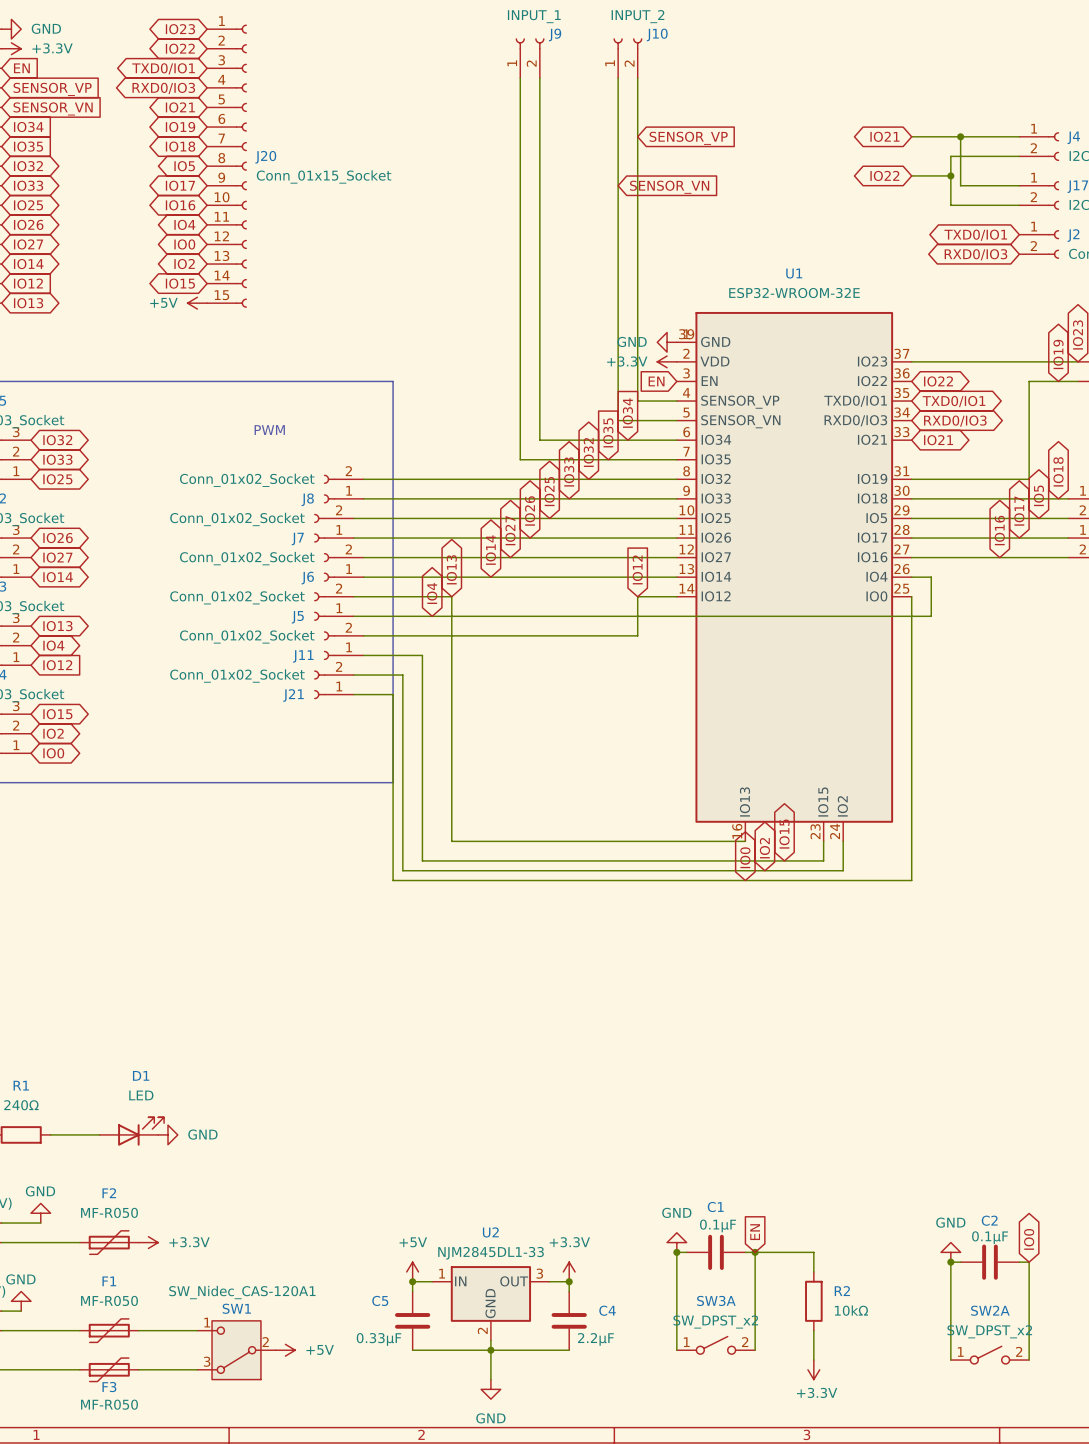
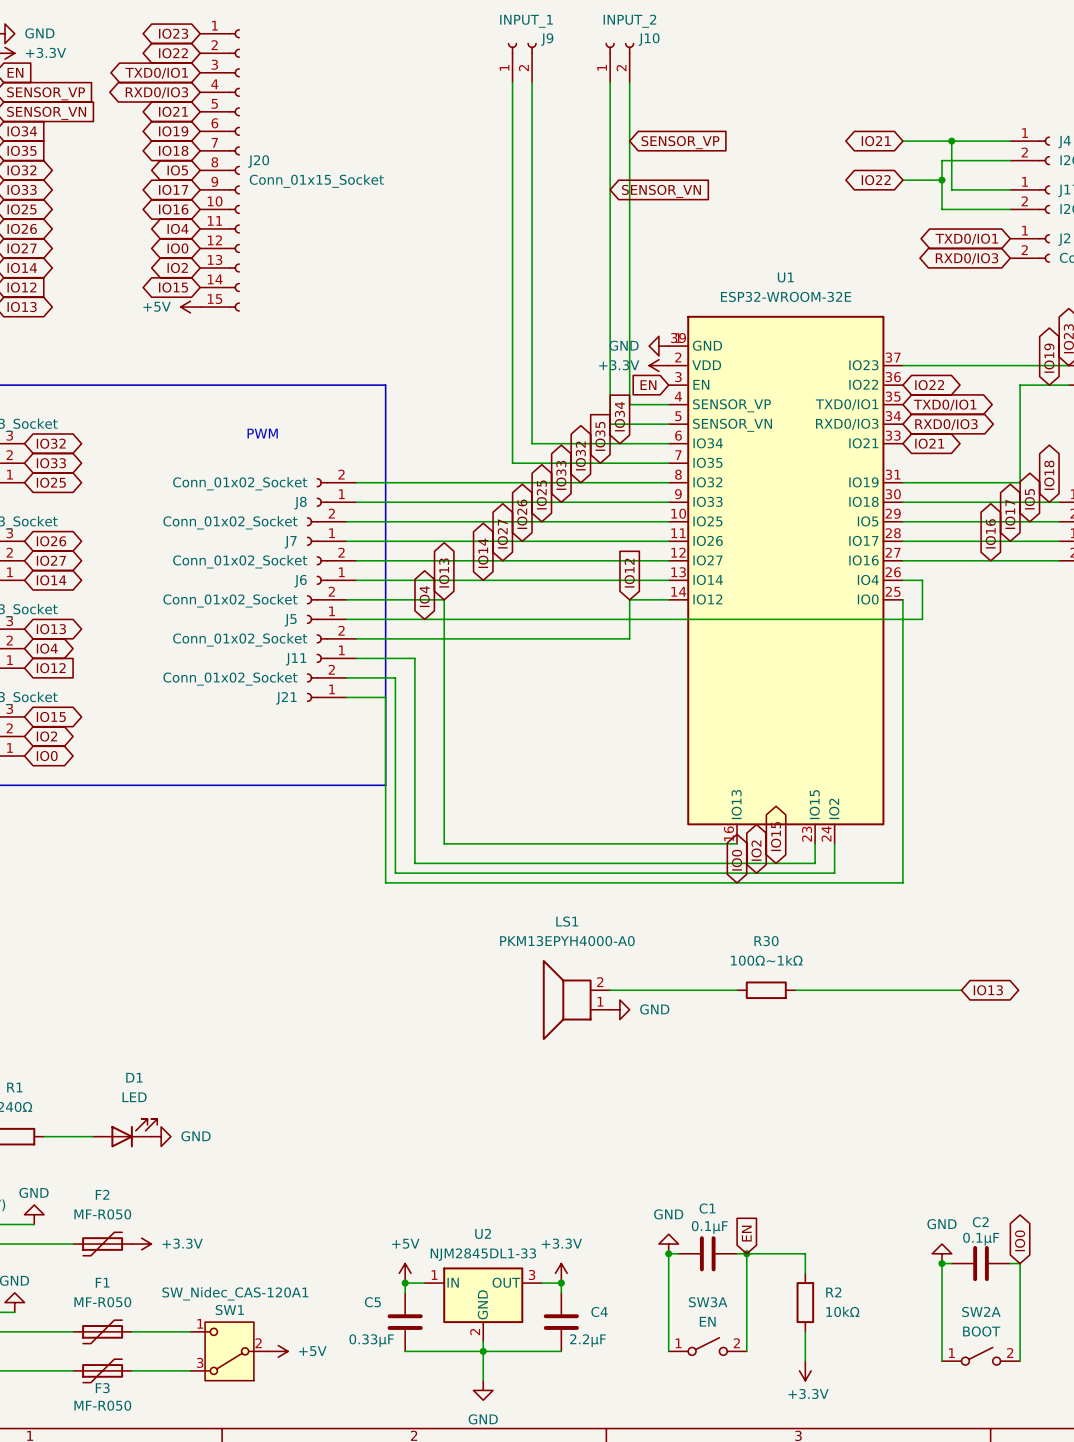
wire: none -> (610, 990) (737, 990)
R30: none -> 100Ω~1kΩ (766, 990)
wire: none -> (795, 990) (961, 990)
global label: none -> IO13 (988, 990)
LS1: none -> PKM13EPYH4000-A0 (576, 1000)
power symbol: none -> GND (619, 1009)
SW3A value: SW_DPST_x2 (715, 1322) -> EN (707, 1321)
SW2A value: SW_DPST_x2 (989, 1331) -> BOOT (981, 1331)

